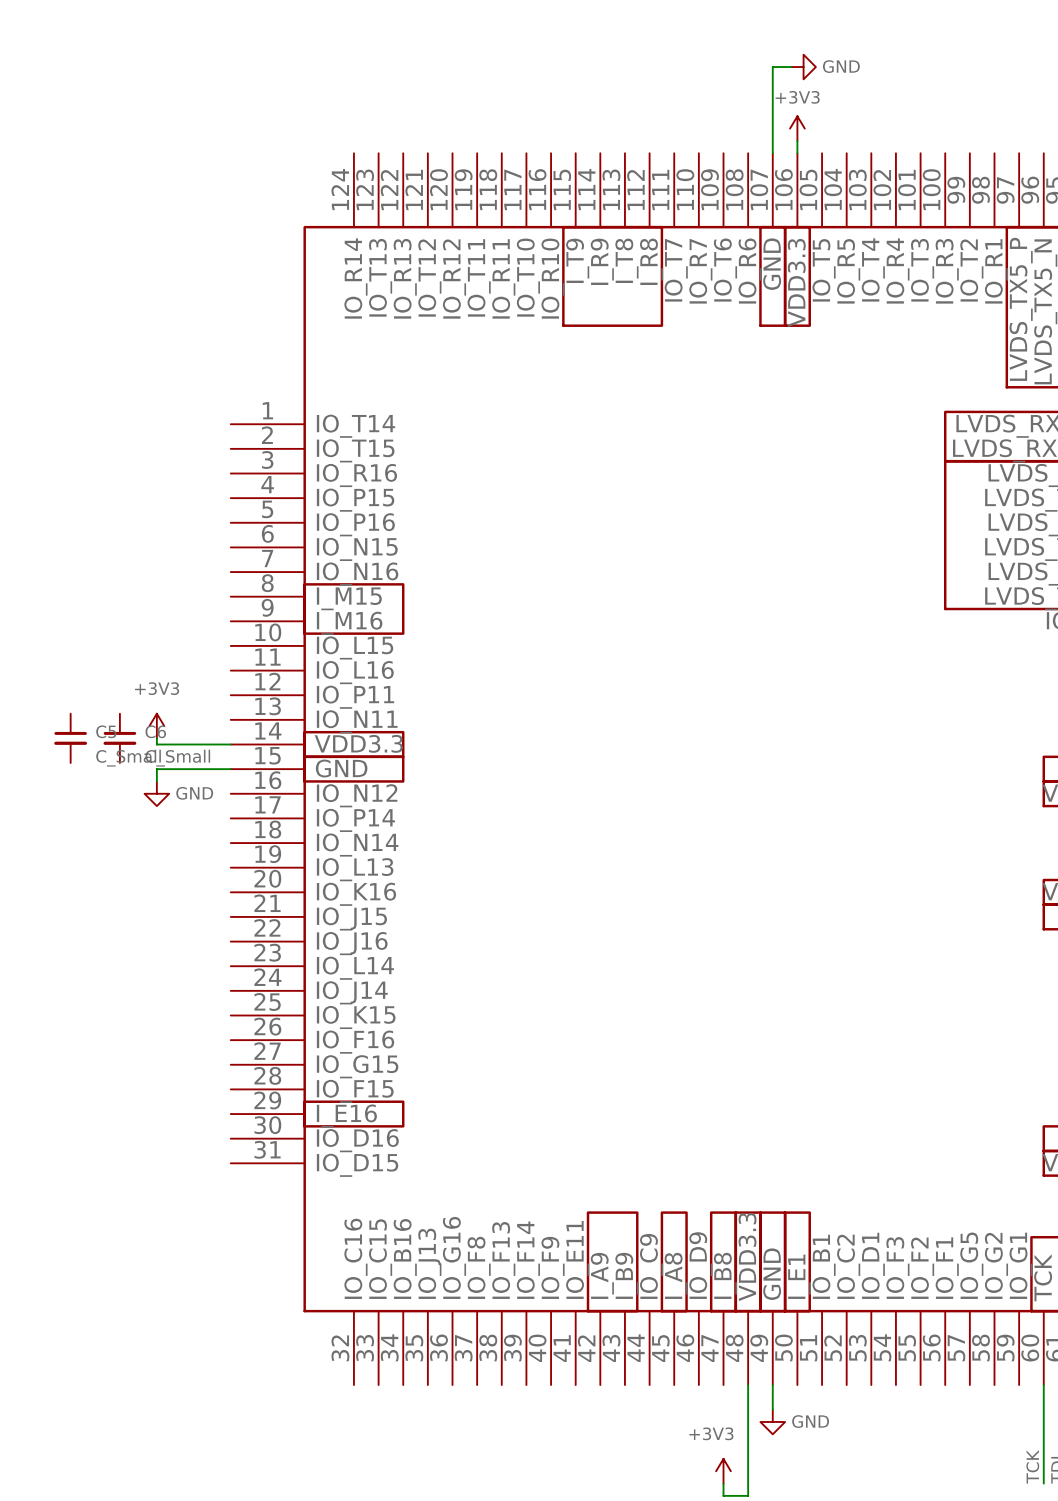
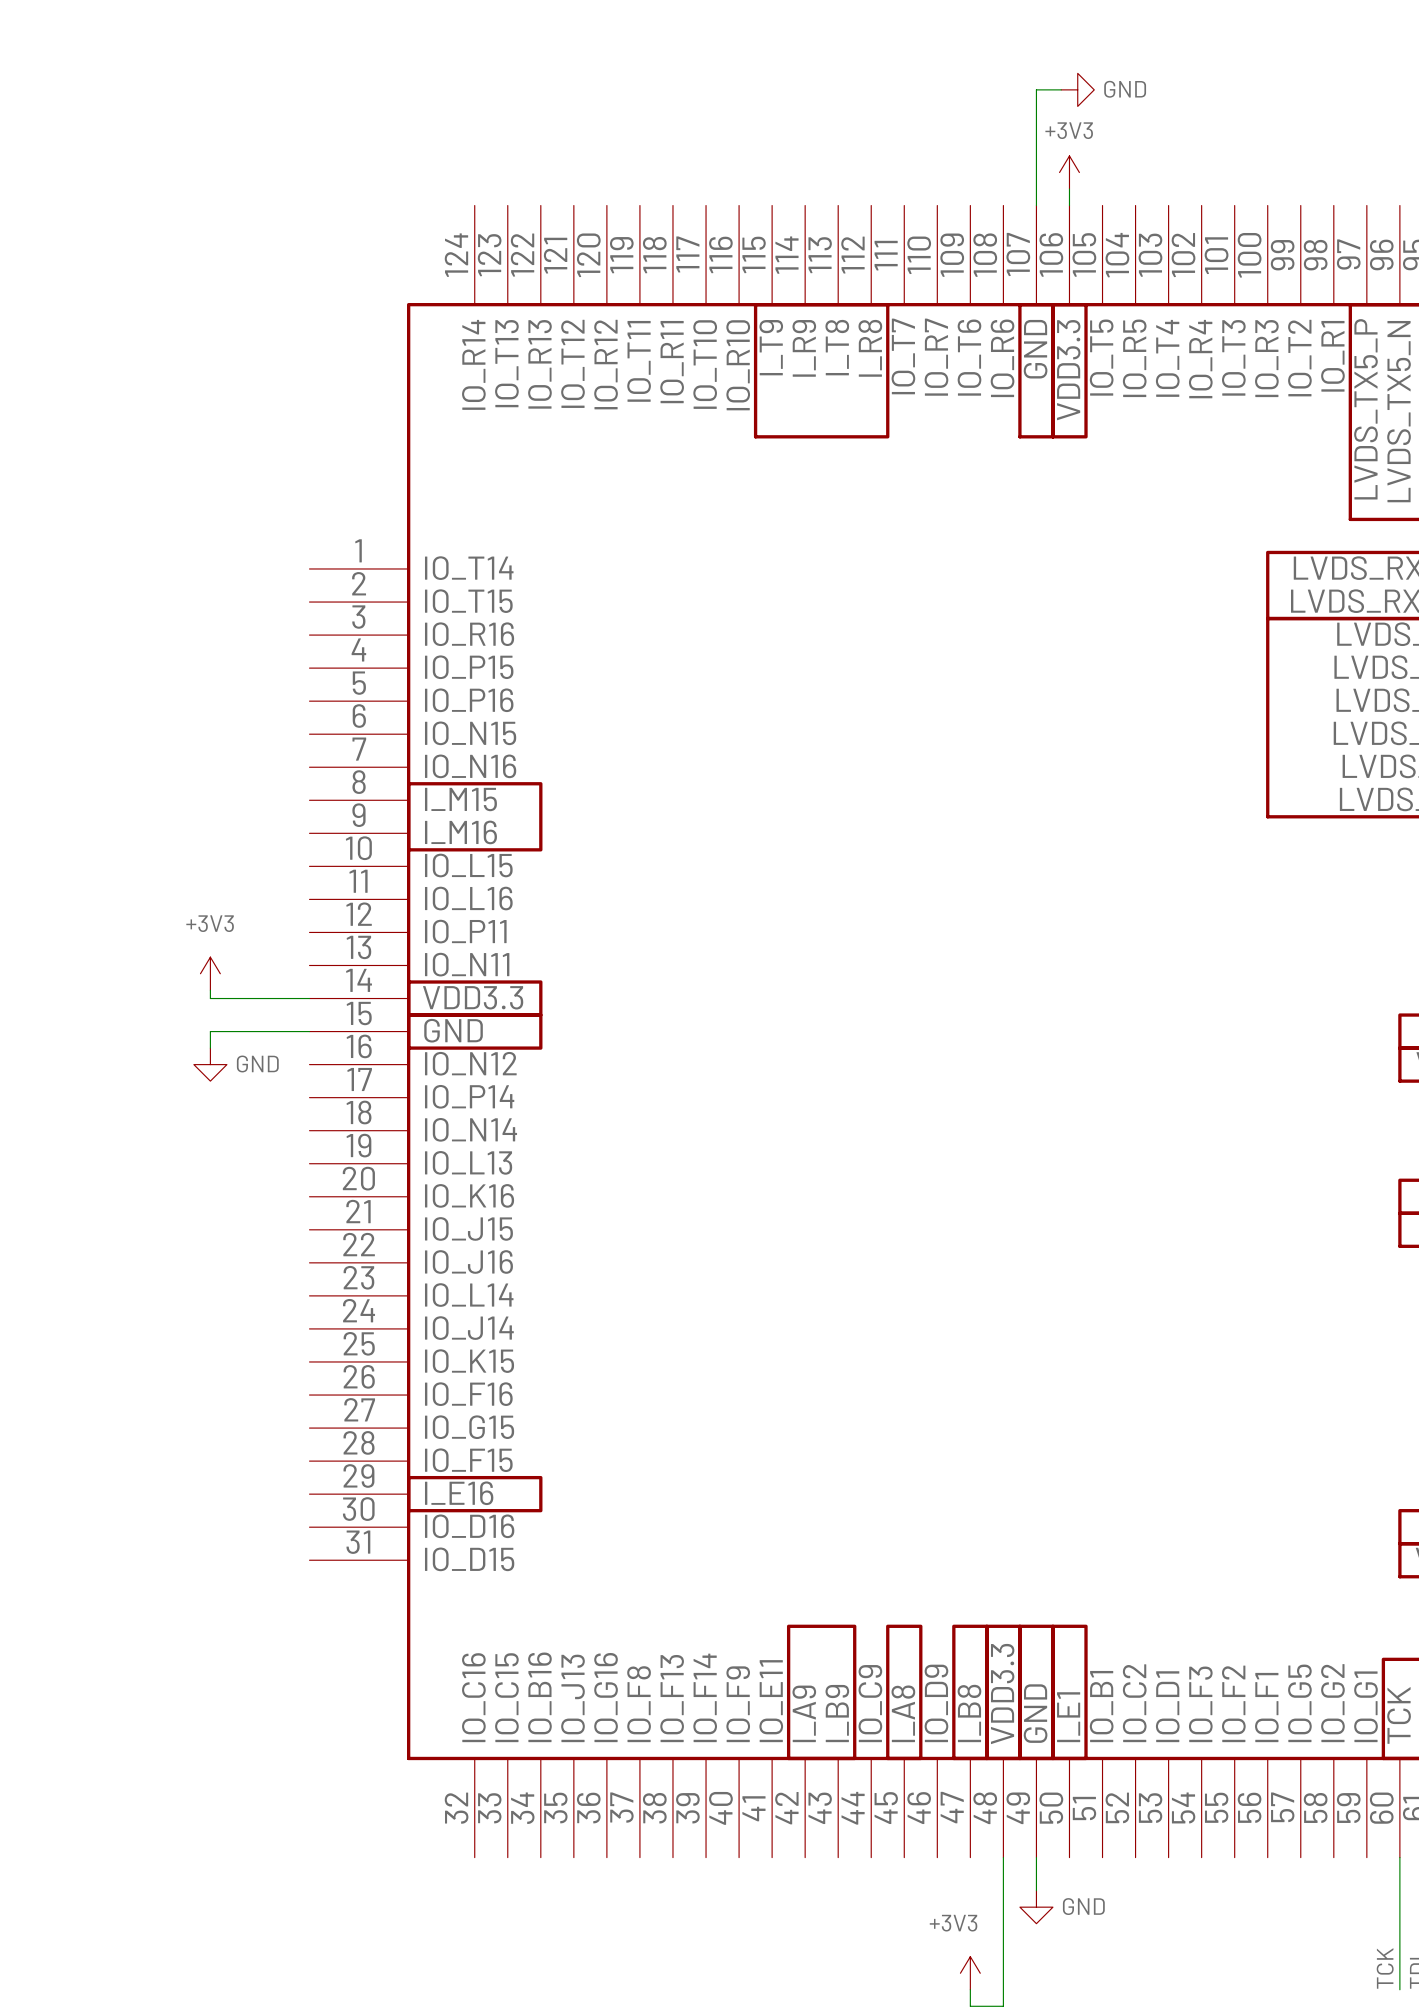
C5: C_Small (70, 738) -> none
C6: C_Small (119, 738) -> none

